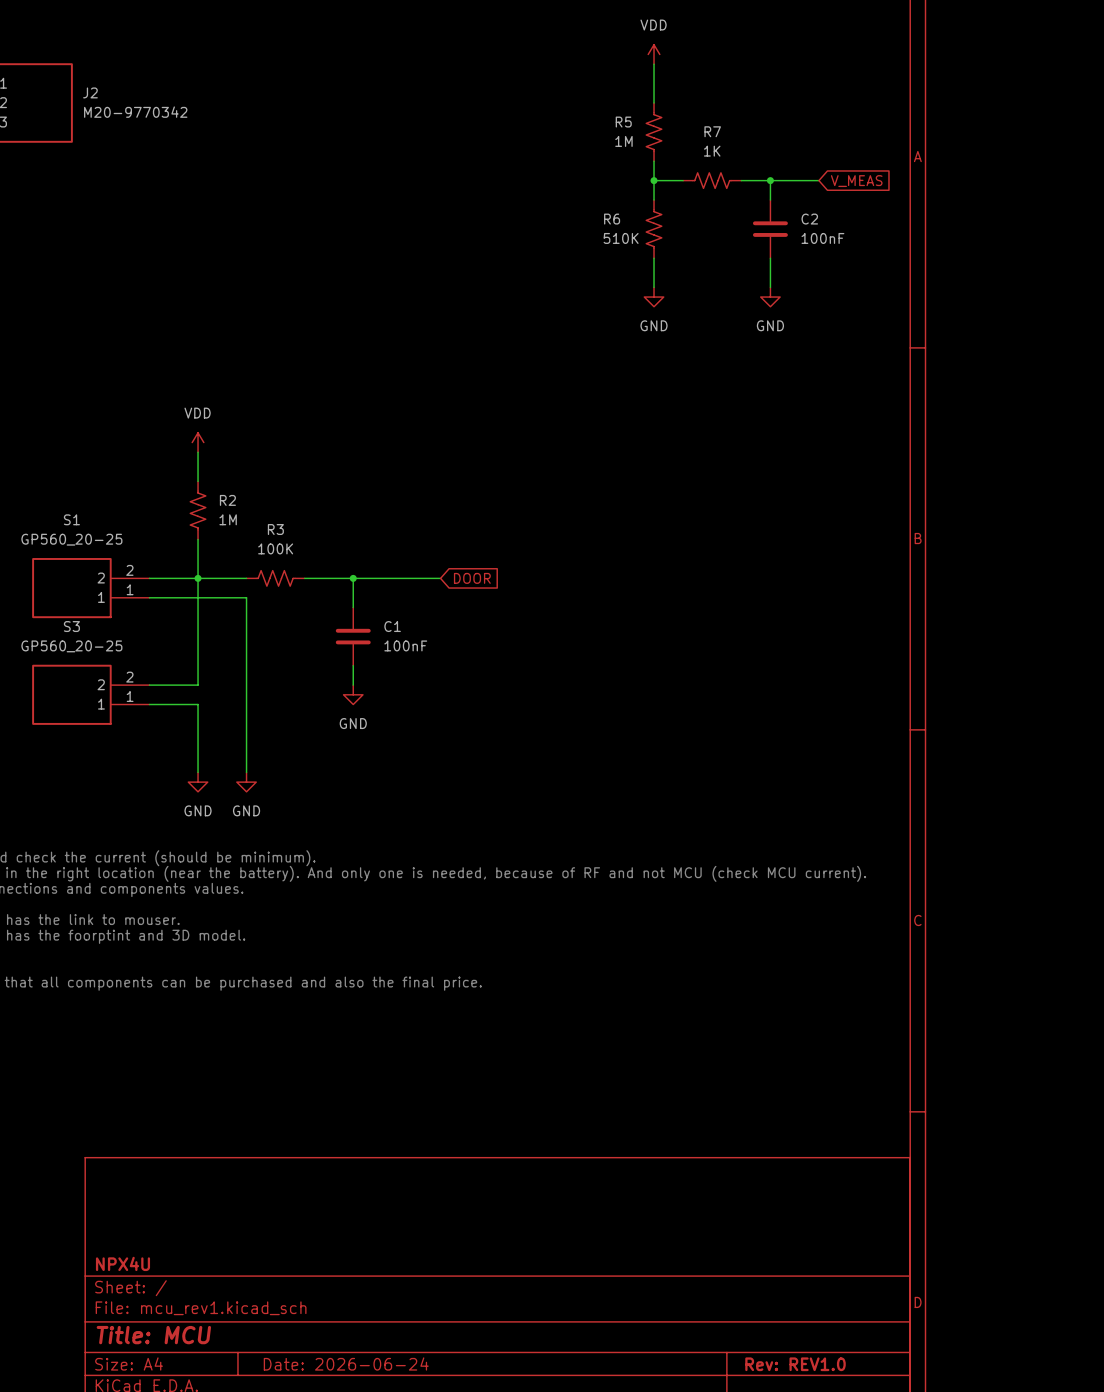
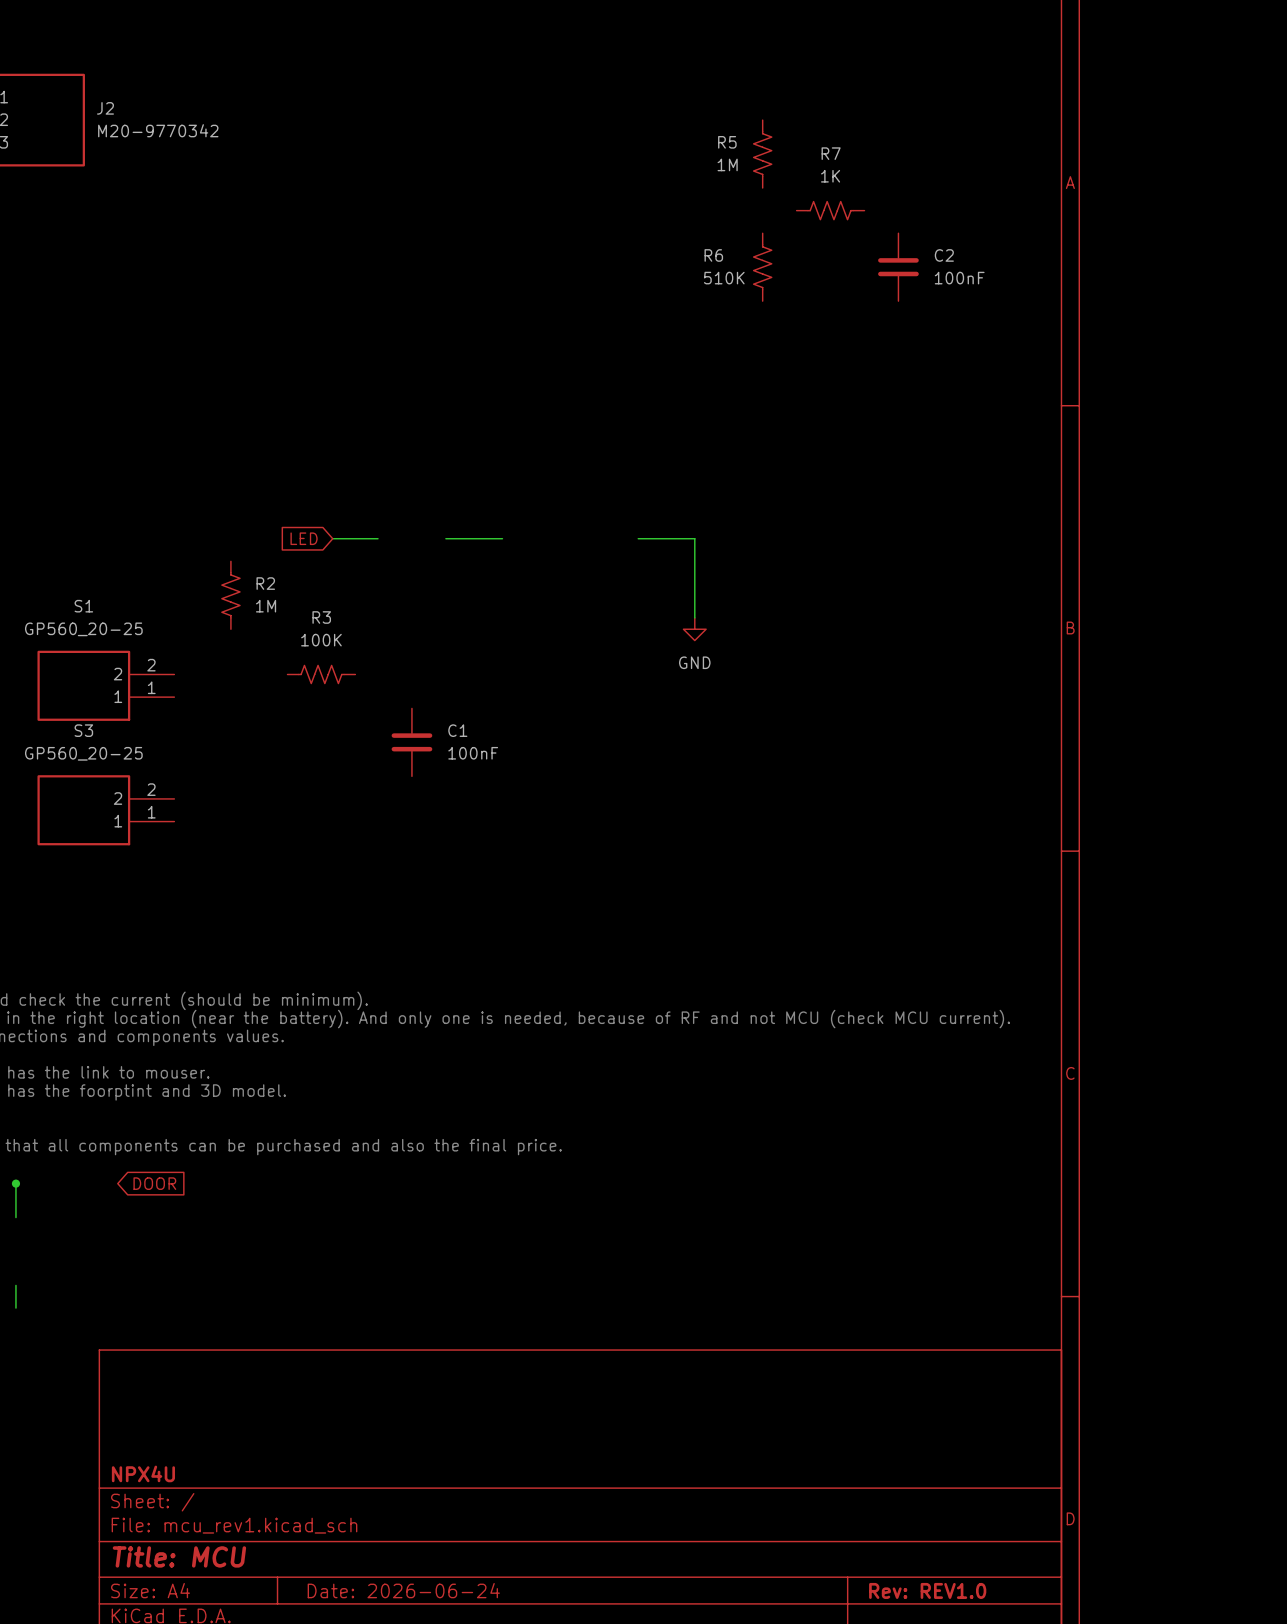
power symbol: VDD (654, 54) -> none
wire: (654, 64) (654, 103) -> none
wire: (654, 161) (654, 200) -> none
wire: (654, 180) (683, 180) -> none
junction: (654, 180) -> none
wire: (741, 180) (818, 180) -> none
wire: (770, 180) (770, 200) -> none
junction: (770, 180) -> none
global label: V_MEAS (856, 181) -> none
wire: (654, 258) (654, 287) -> none
wire: (770, 258) (770, 287) -> none
power symbol: GND (654, 297) -> none
power symbol: GND (770, 297) -> none
power symbol: VDD (198, 442) -> none
wire: (198, 452) (198, 481) -> none
global label: none -> LED (304, 538)
wire: none -> (332, 538) (378, 538)
wire: none -> (445, 538) (502, 538)
wire: none -> (638, 538) (694, 538) (694, 617)
wire: (198, 539) (198, 685) (149, 685) -> none
power symbol: none -> GND (694, 629)
wire: (149, 578) (246, 578) -> none
junction: (198, 578) -> none
wire: (304, 578) (440, 578) -> none
wire: (353, 578) (353, 607) -> none
junction: (353, 578) -> none
global label: DOOR (472, 578) -> none
wire: (149, 597) (246, 597) (246, 772) -> none
wire: (353, 665) (353, 685) -> none
power symbol: GND (353, 694) -> none
wire: (149, 704) (198, 704) (198, 772) -> none
power symbol: GND (198, 782) -> none
power symbol: GND (246, 782) -> none
wire: none -> (15, 1183) (15, 1217)
junction: none -> (15, 1183)
global label: none -> DOOR (154, 1183)
wire: none -> (15, 1285) (15, 1308)

